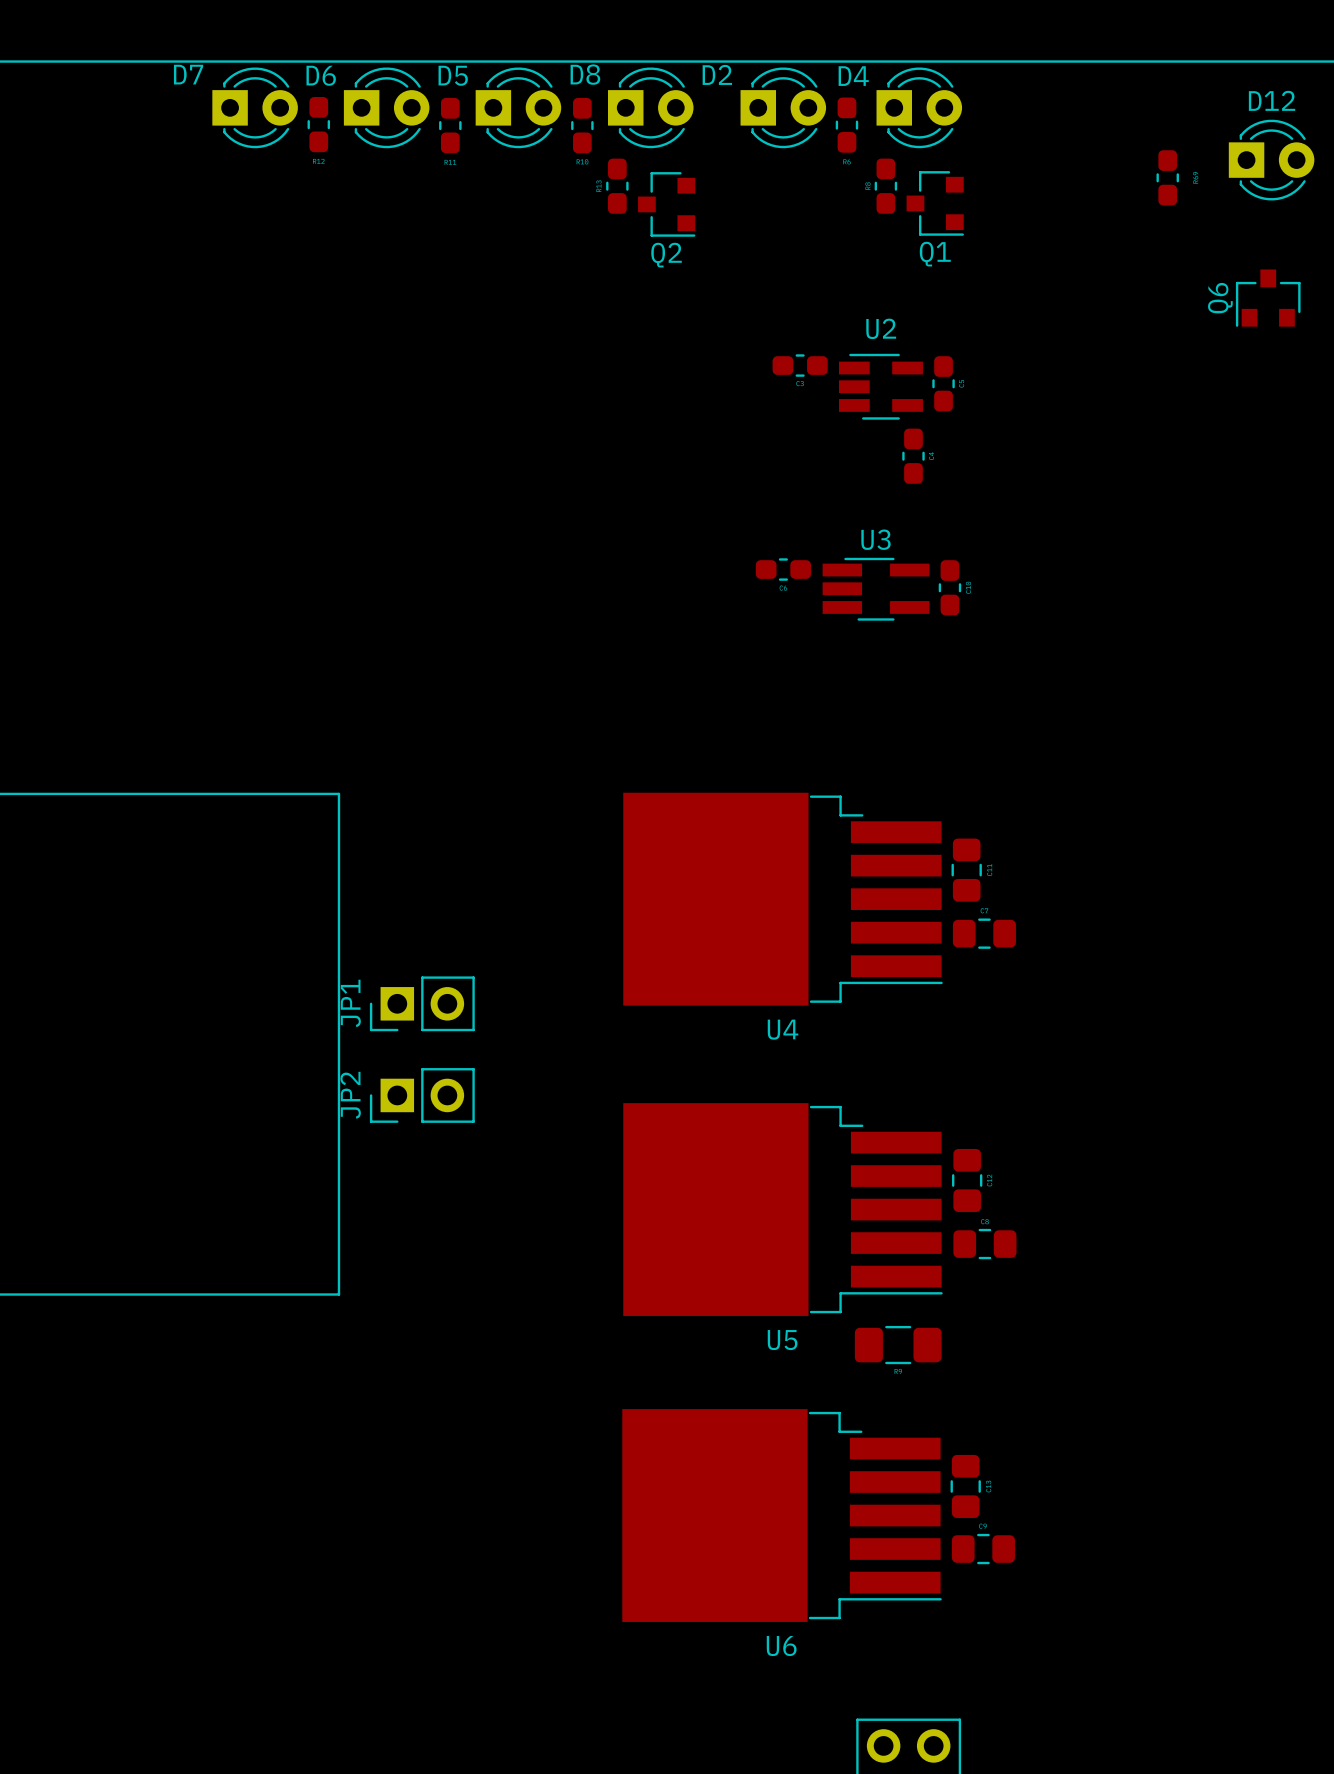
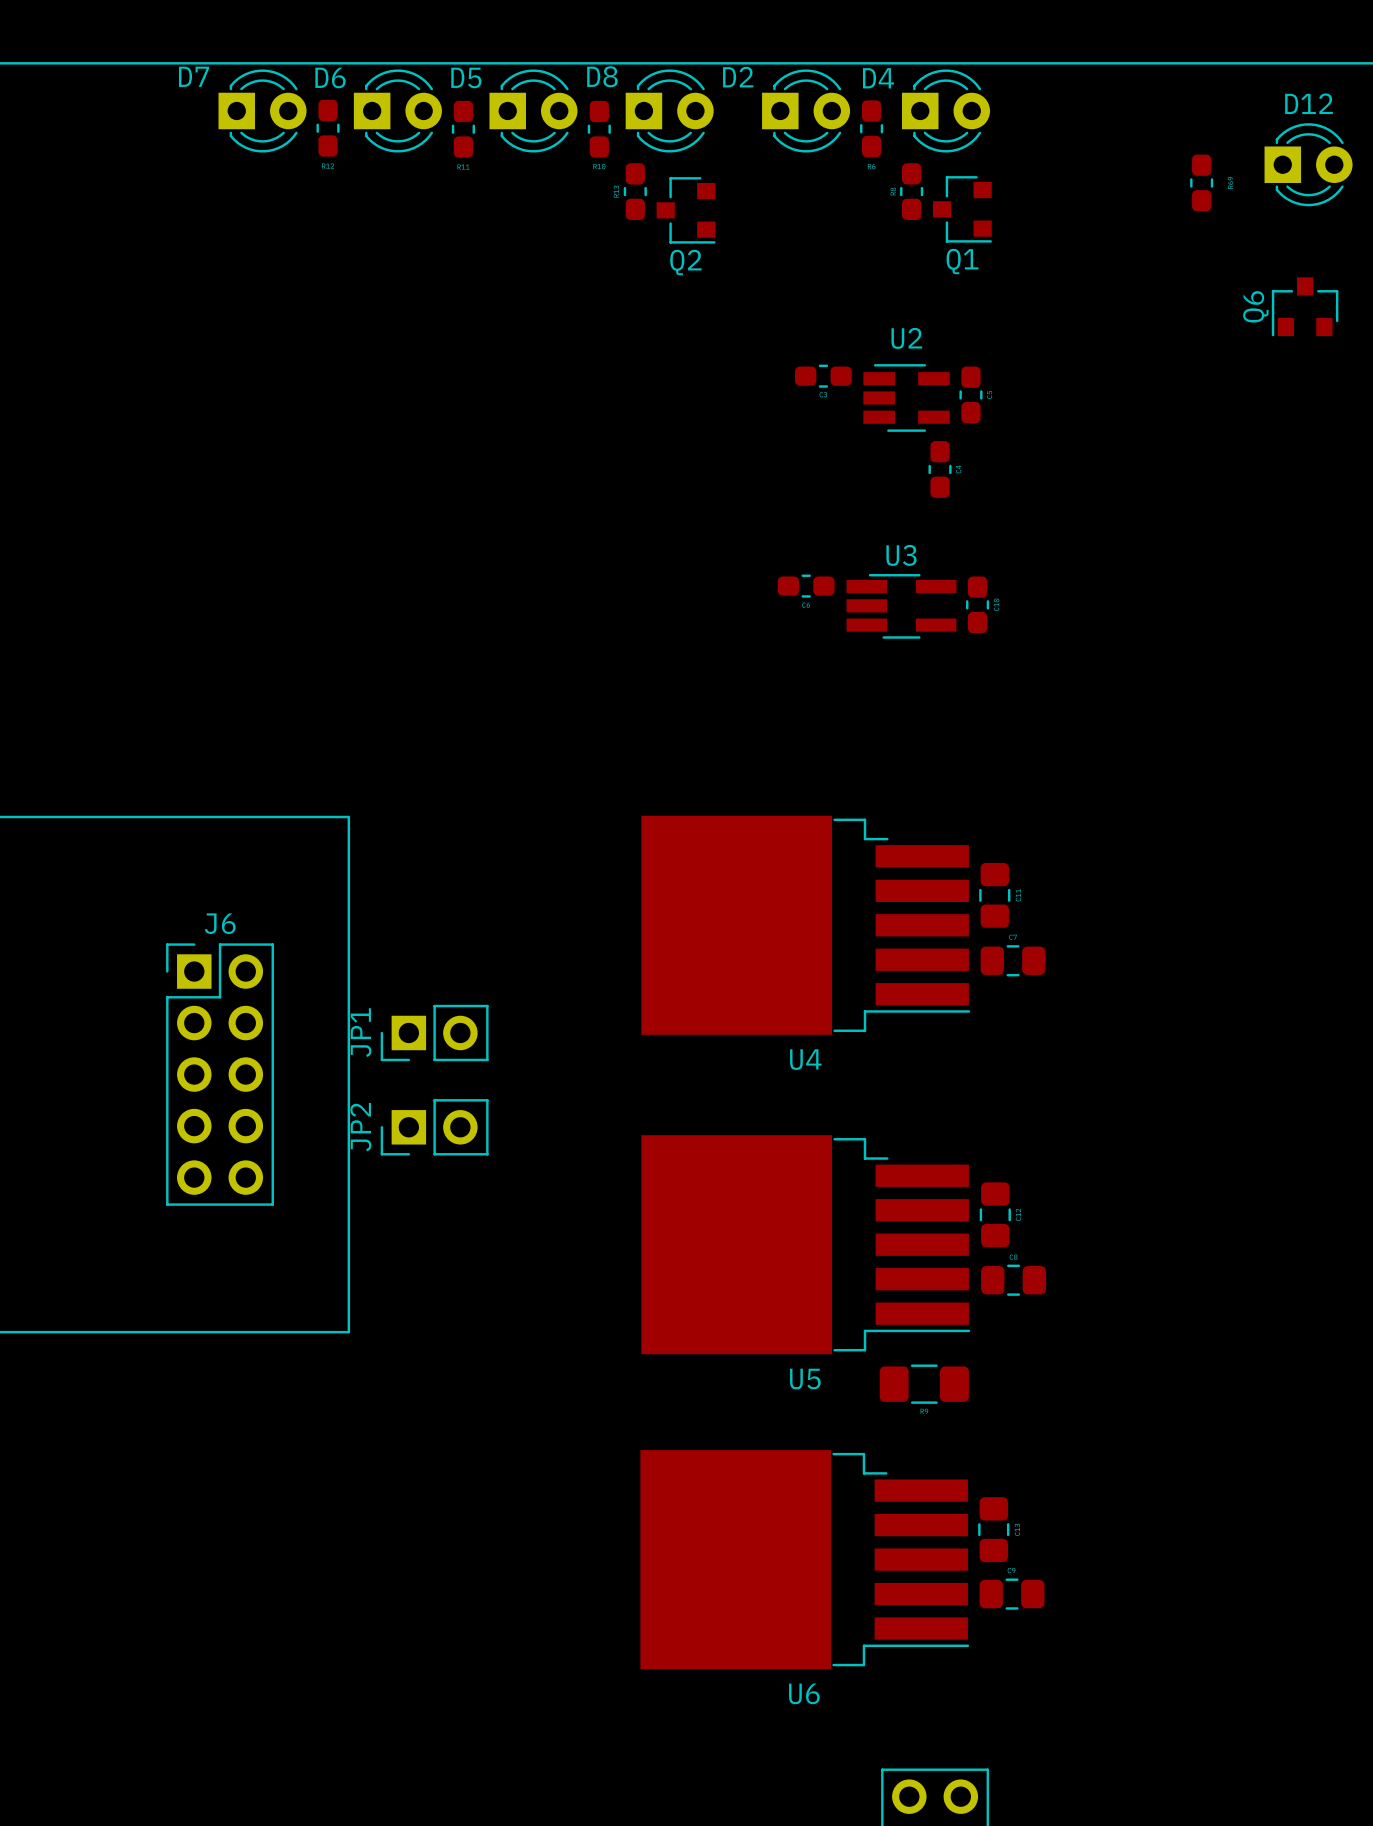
J6: none -> (220, 1074)

